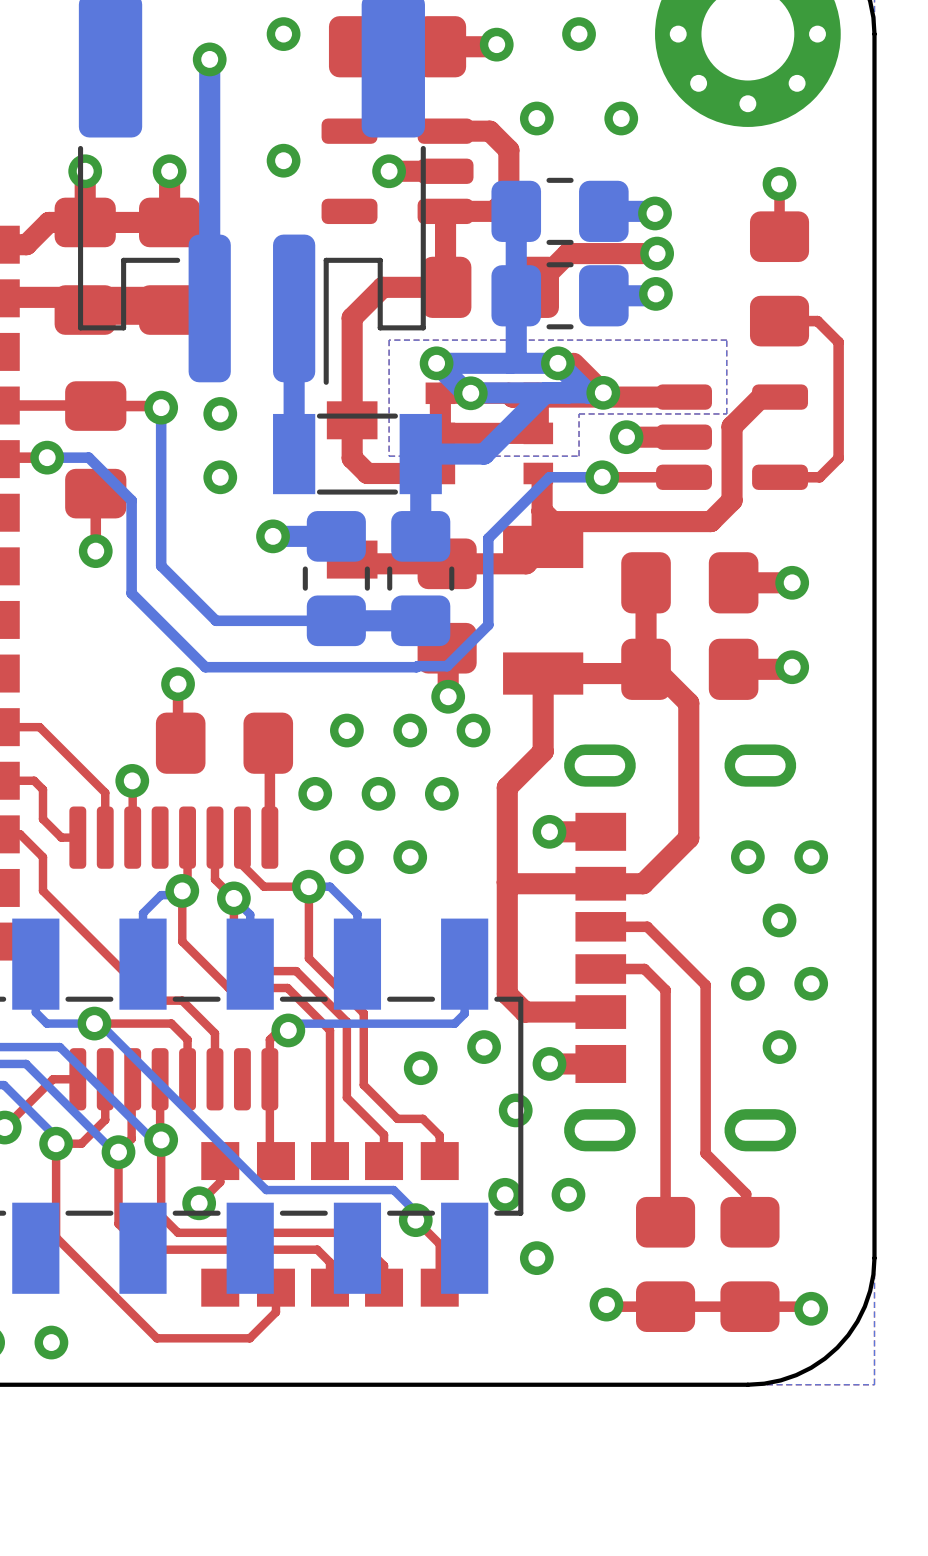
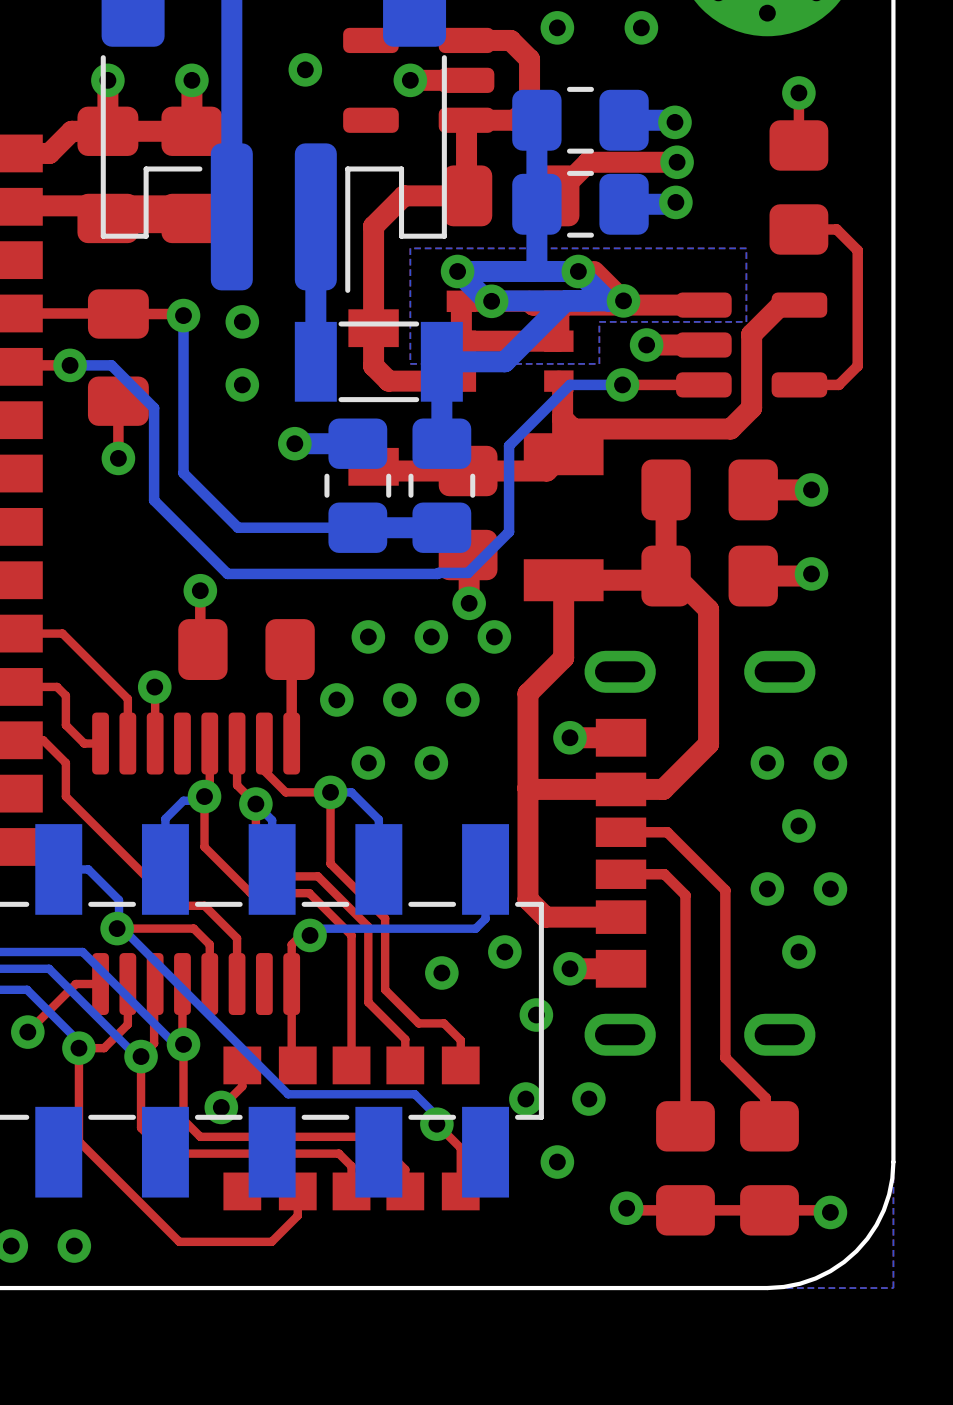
bottom track: (35, 964) (35, 1012) (46, 1023) (99, 1023) -> (58, 869) (88, 869) (119, 900) (119, 925) (122, 928)

